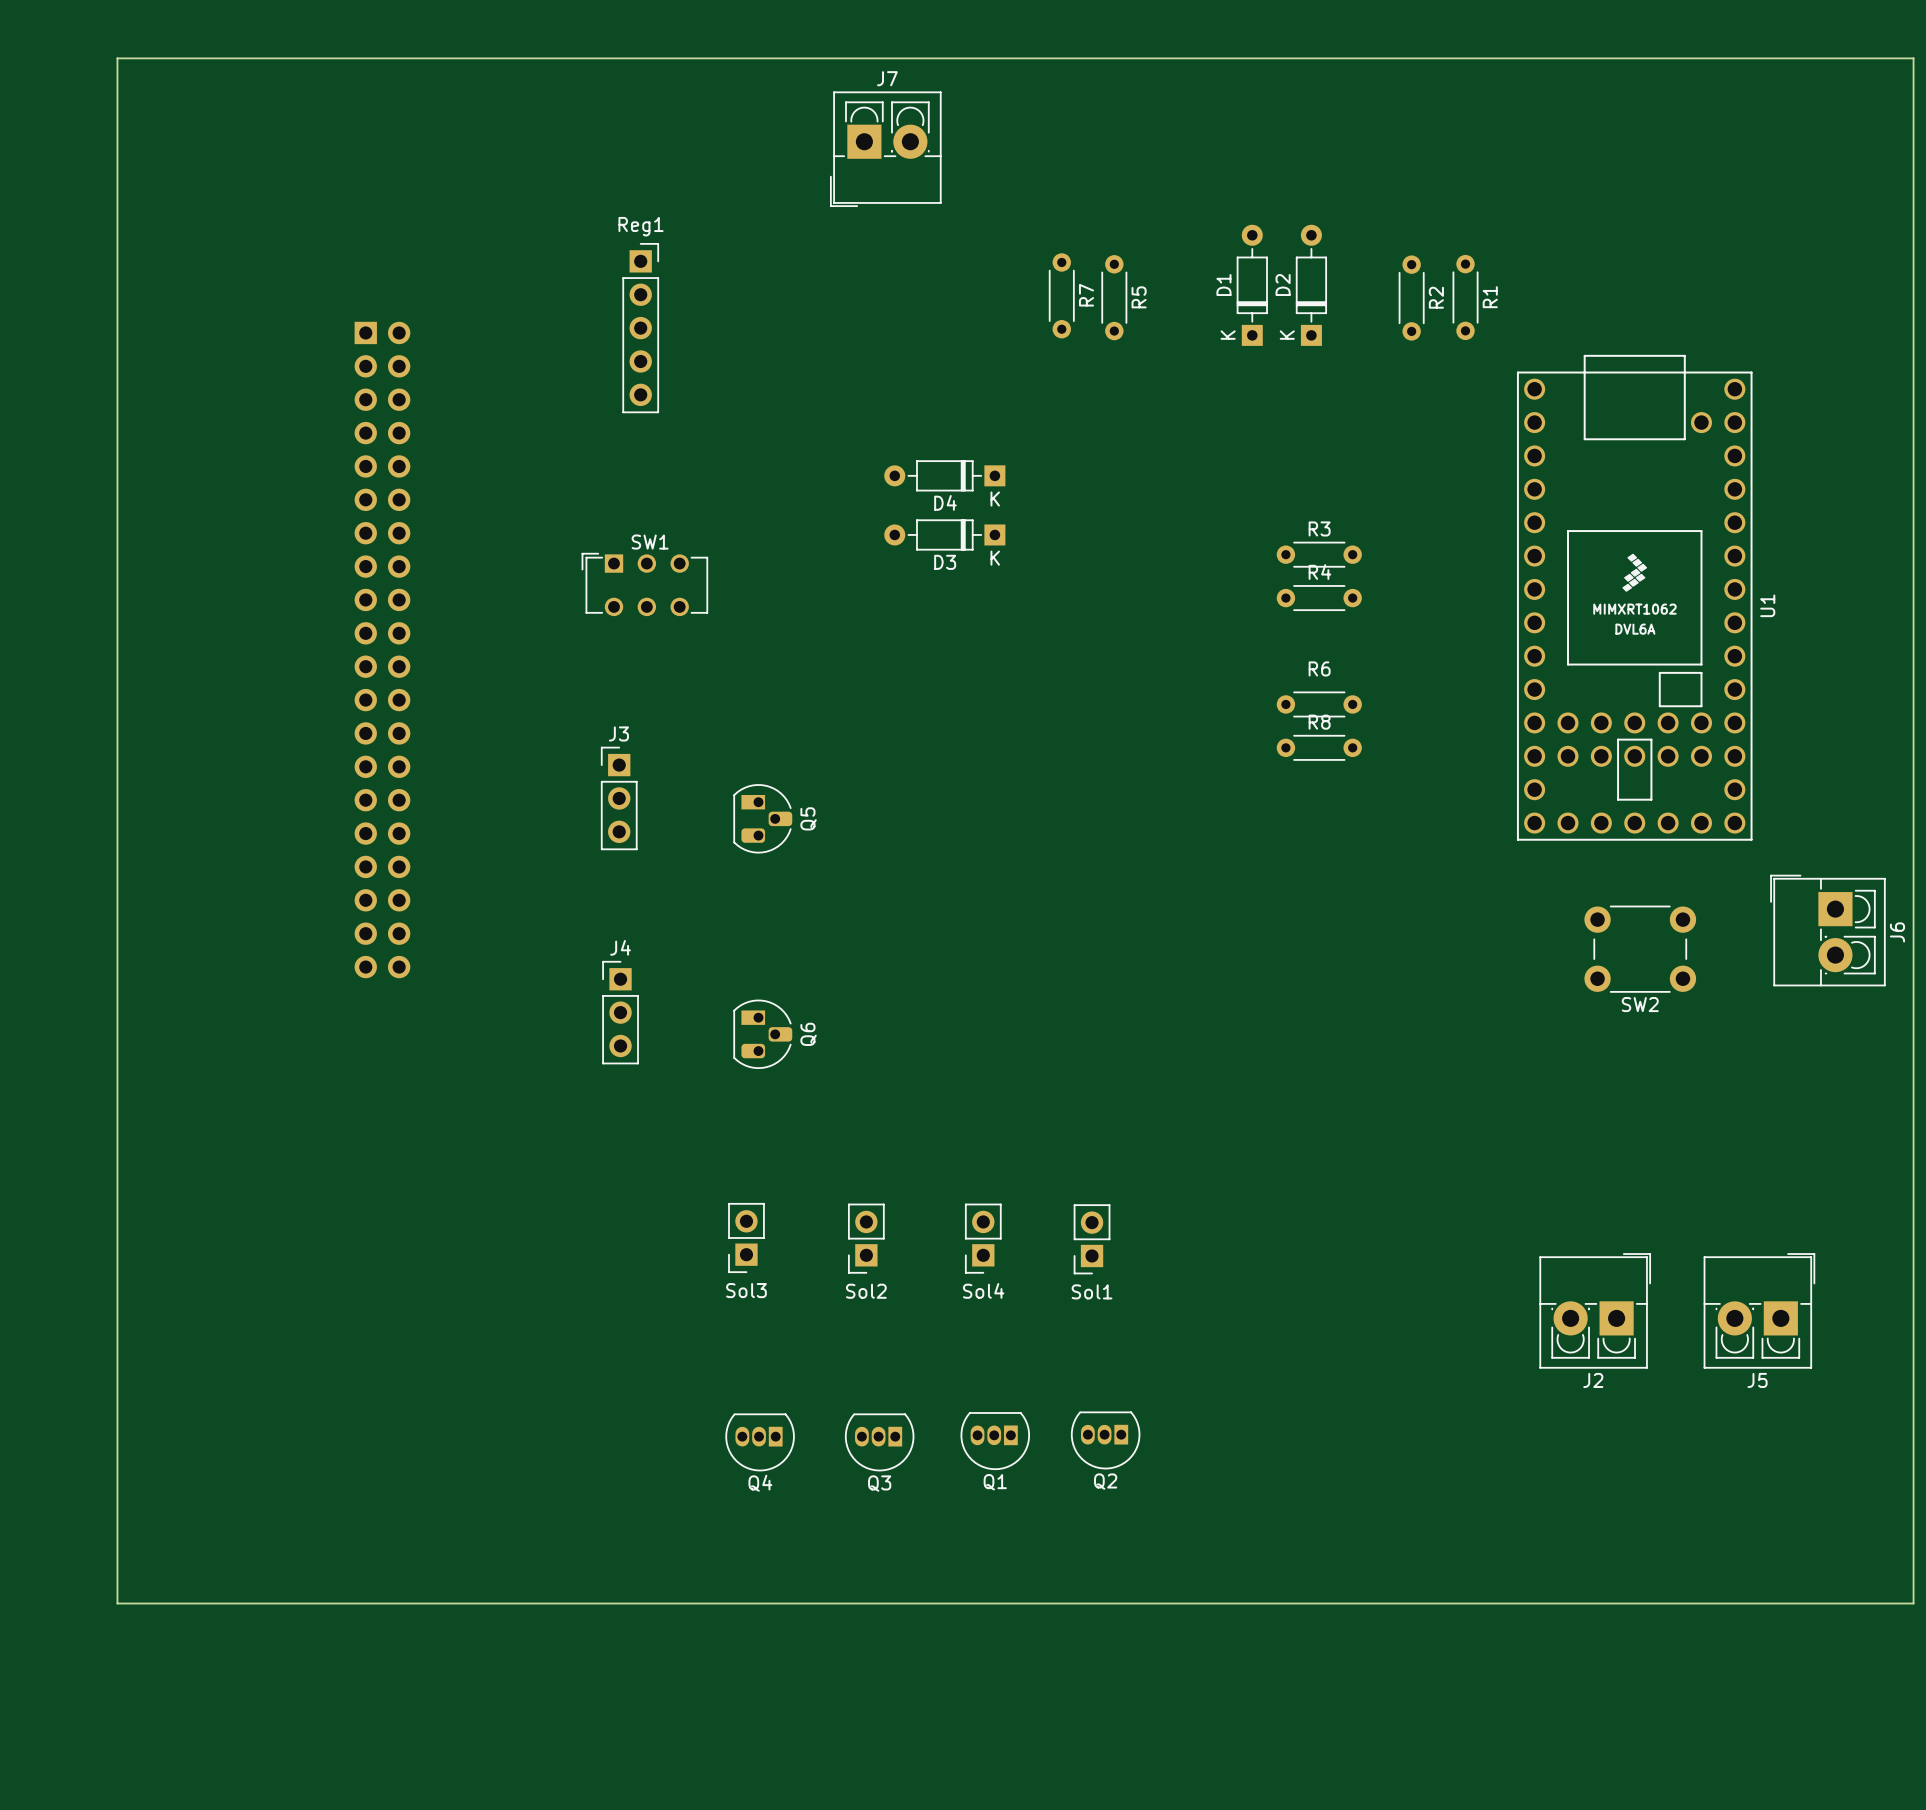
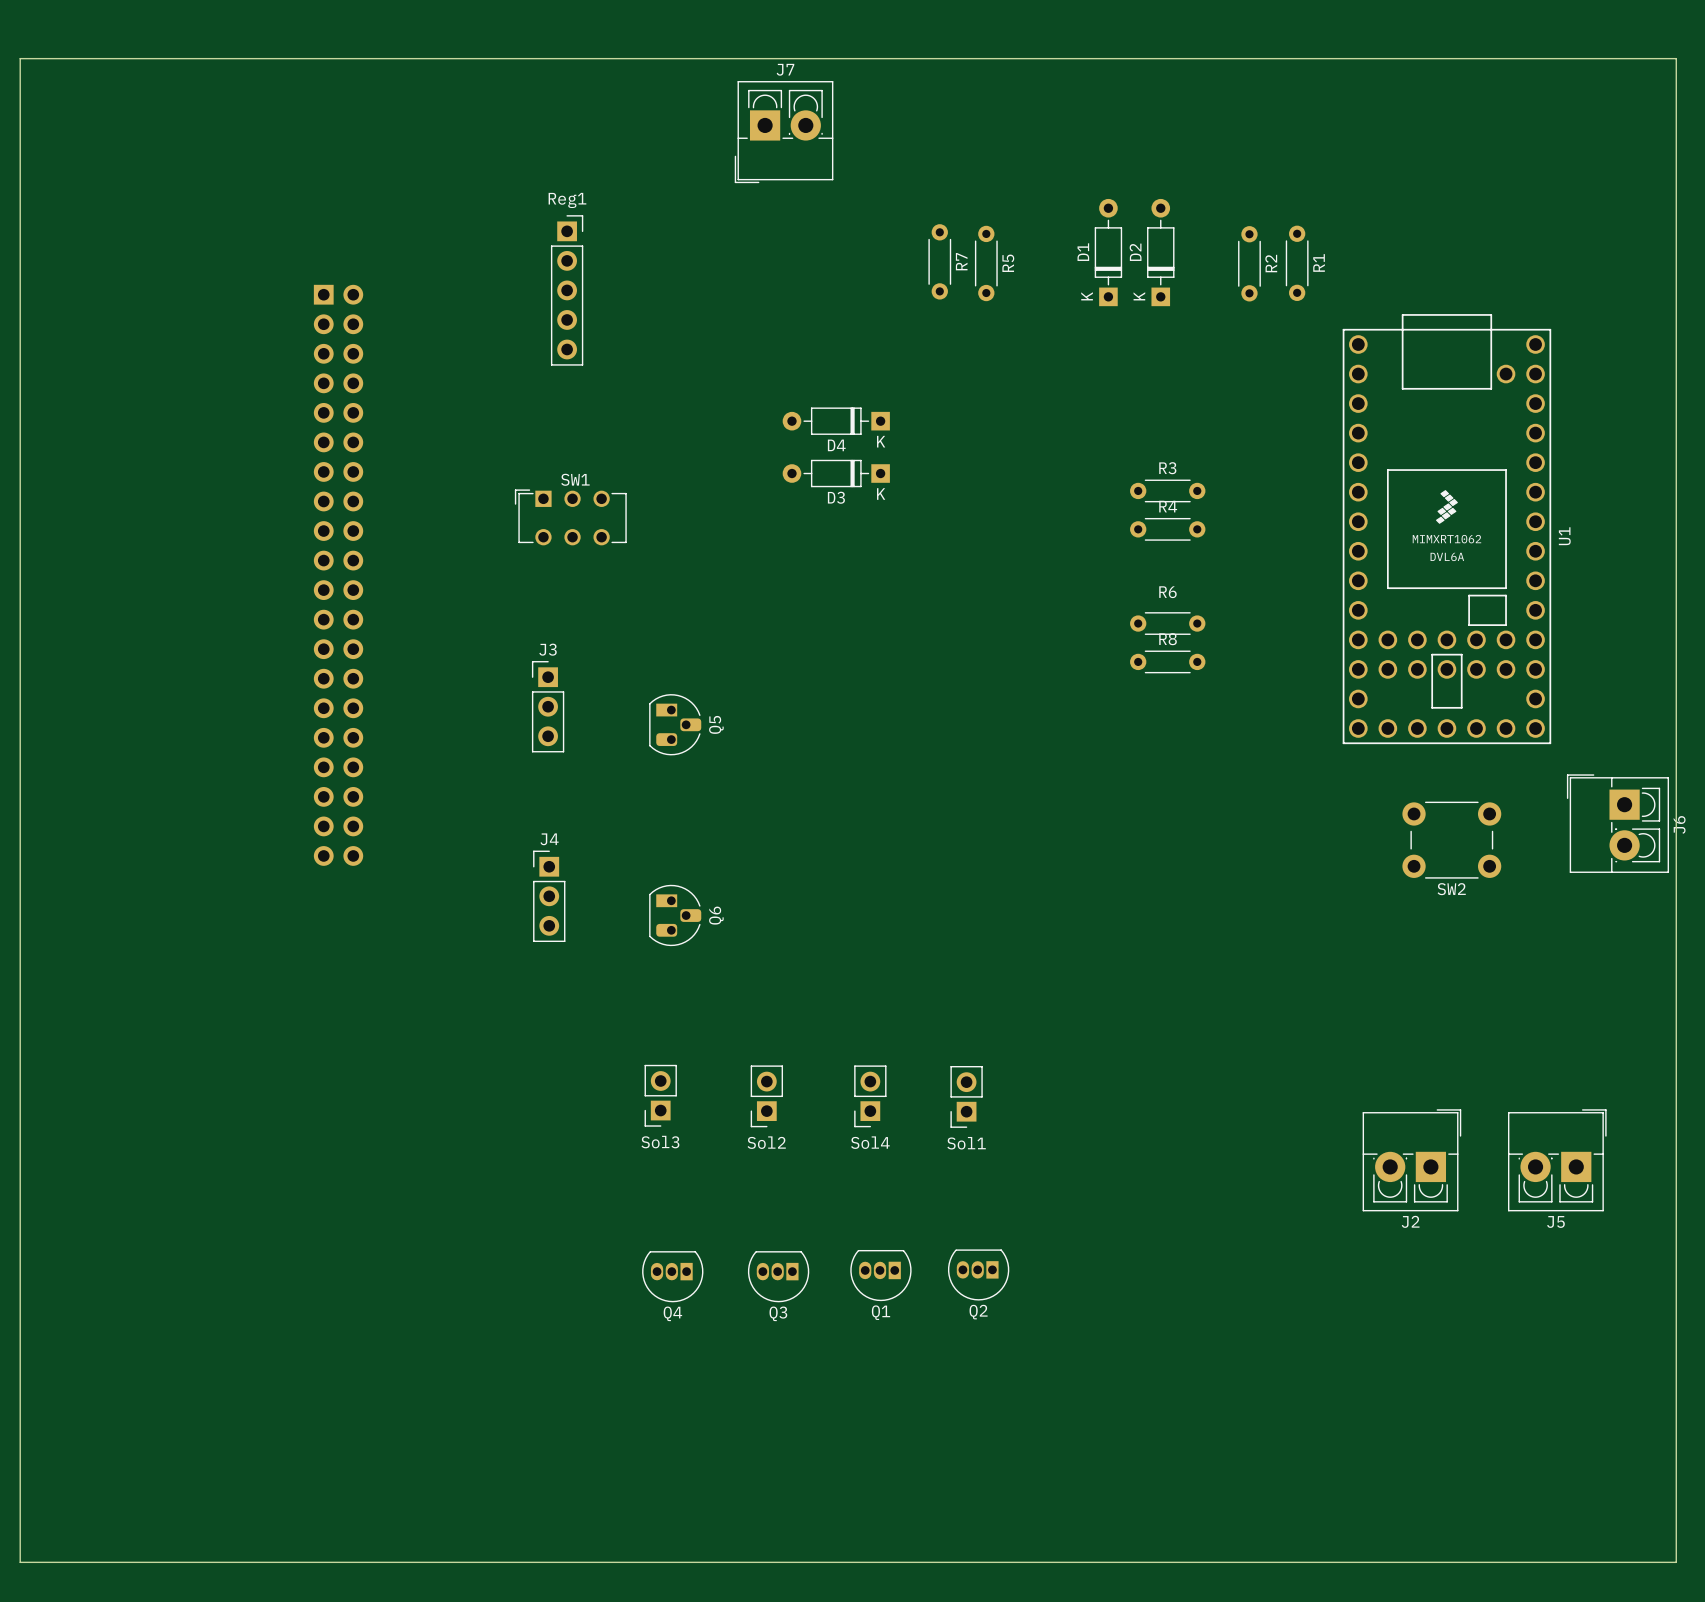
board edge: (117, 58) (1913, 58) (1913, 1603) (117, 1603) (117, 58) -> (20, 58) (20, 1562) (1676, 1562) (1676, 58) (20, 58)

